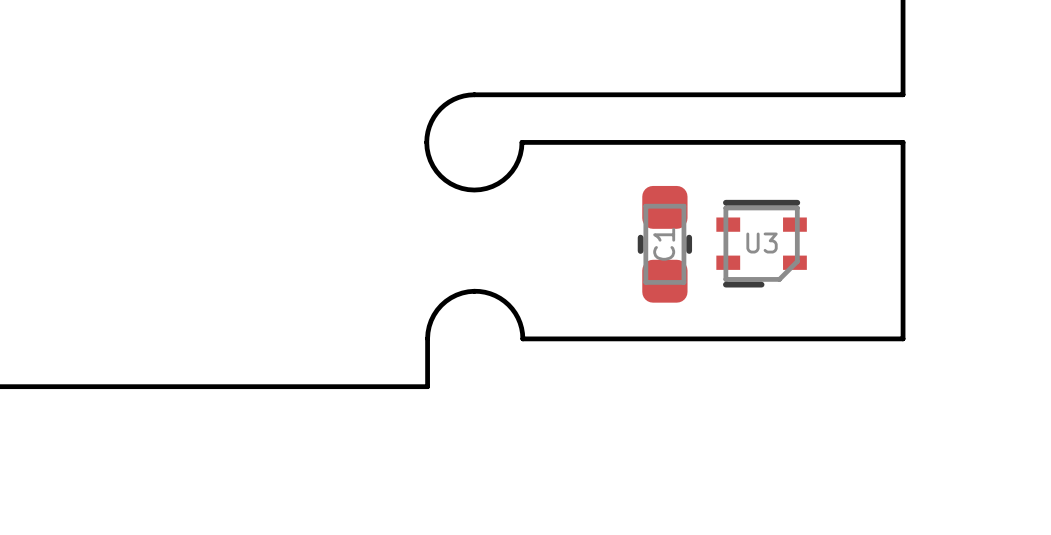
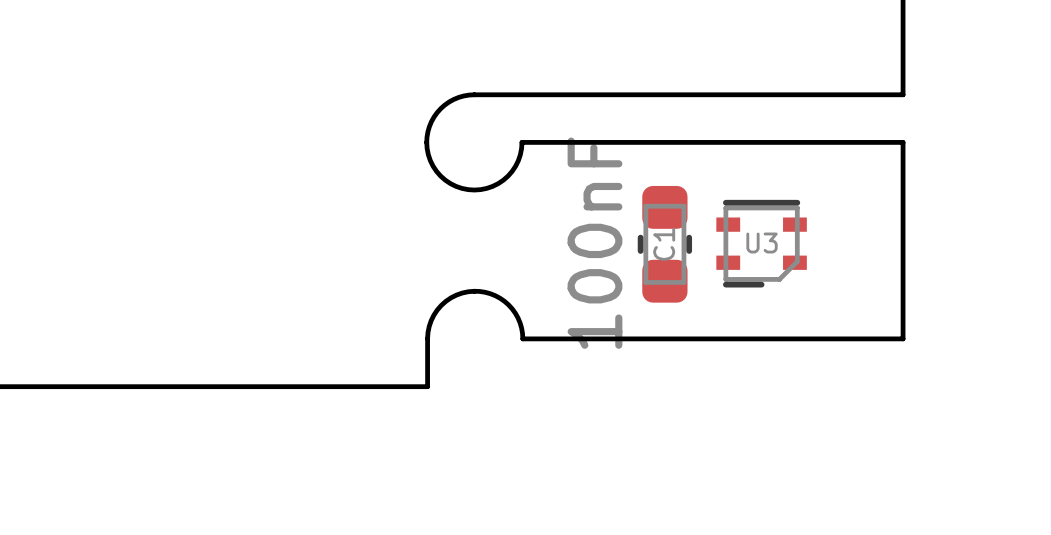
C1 value: none -> 100nF (594, 243)

